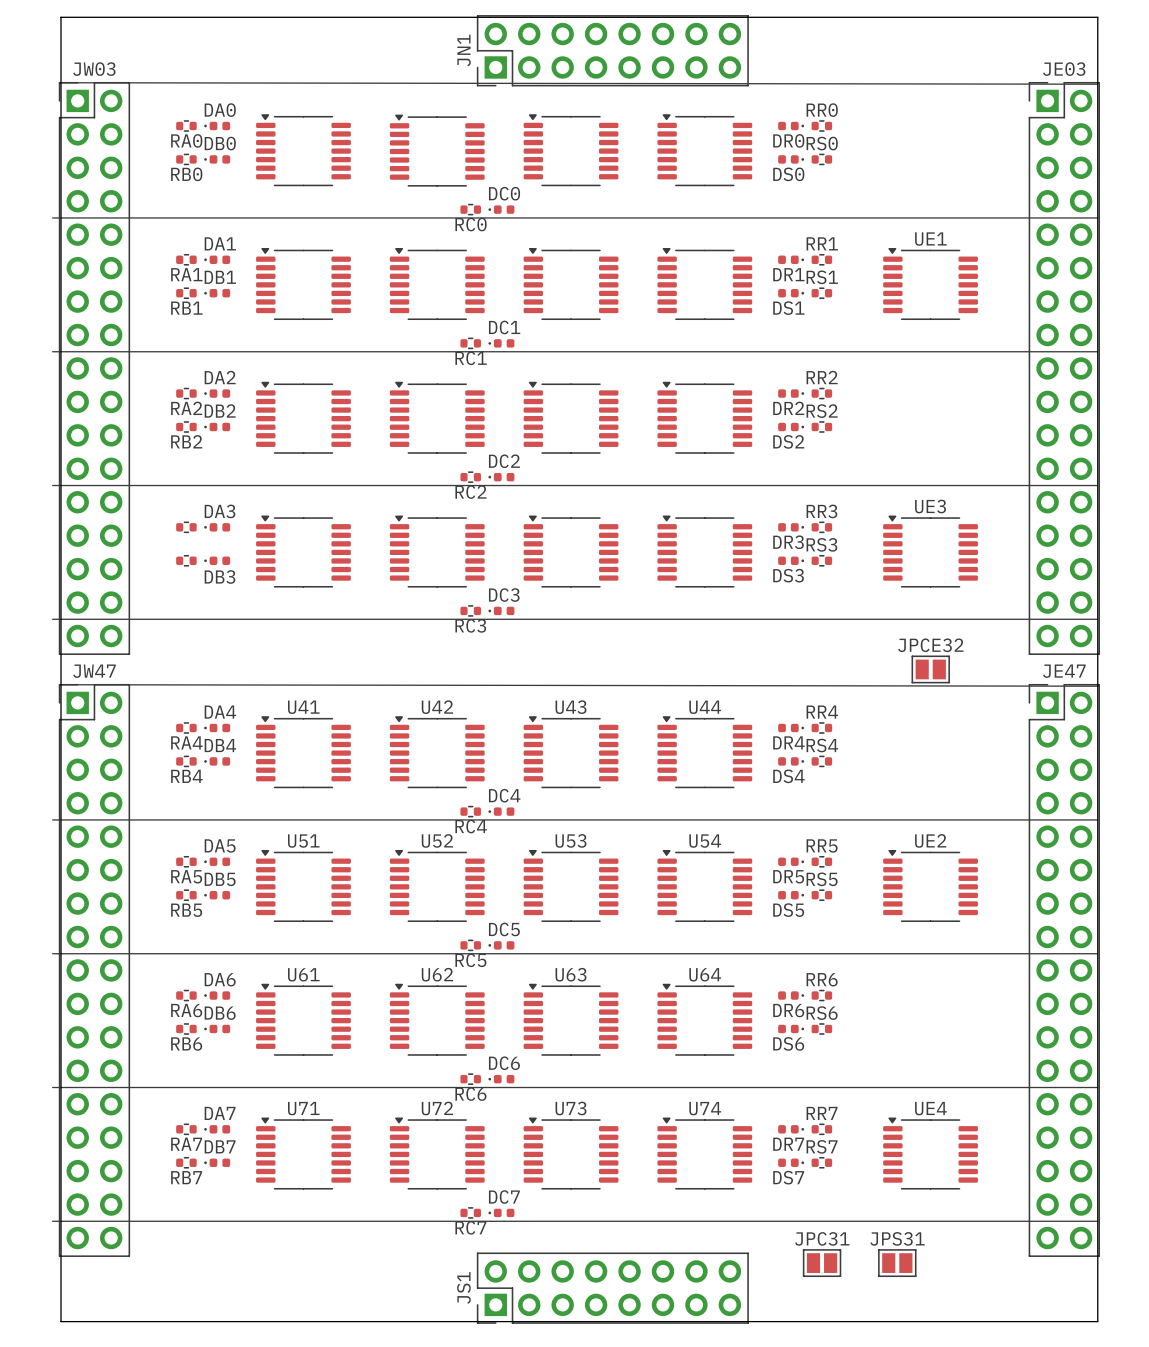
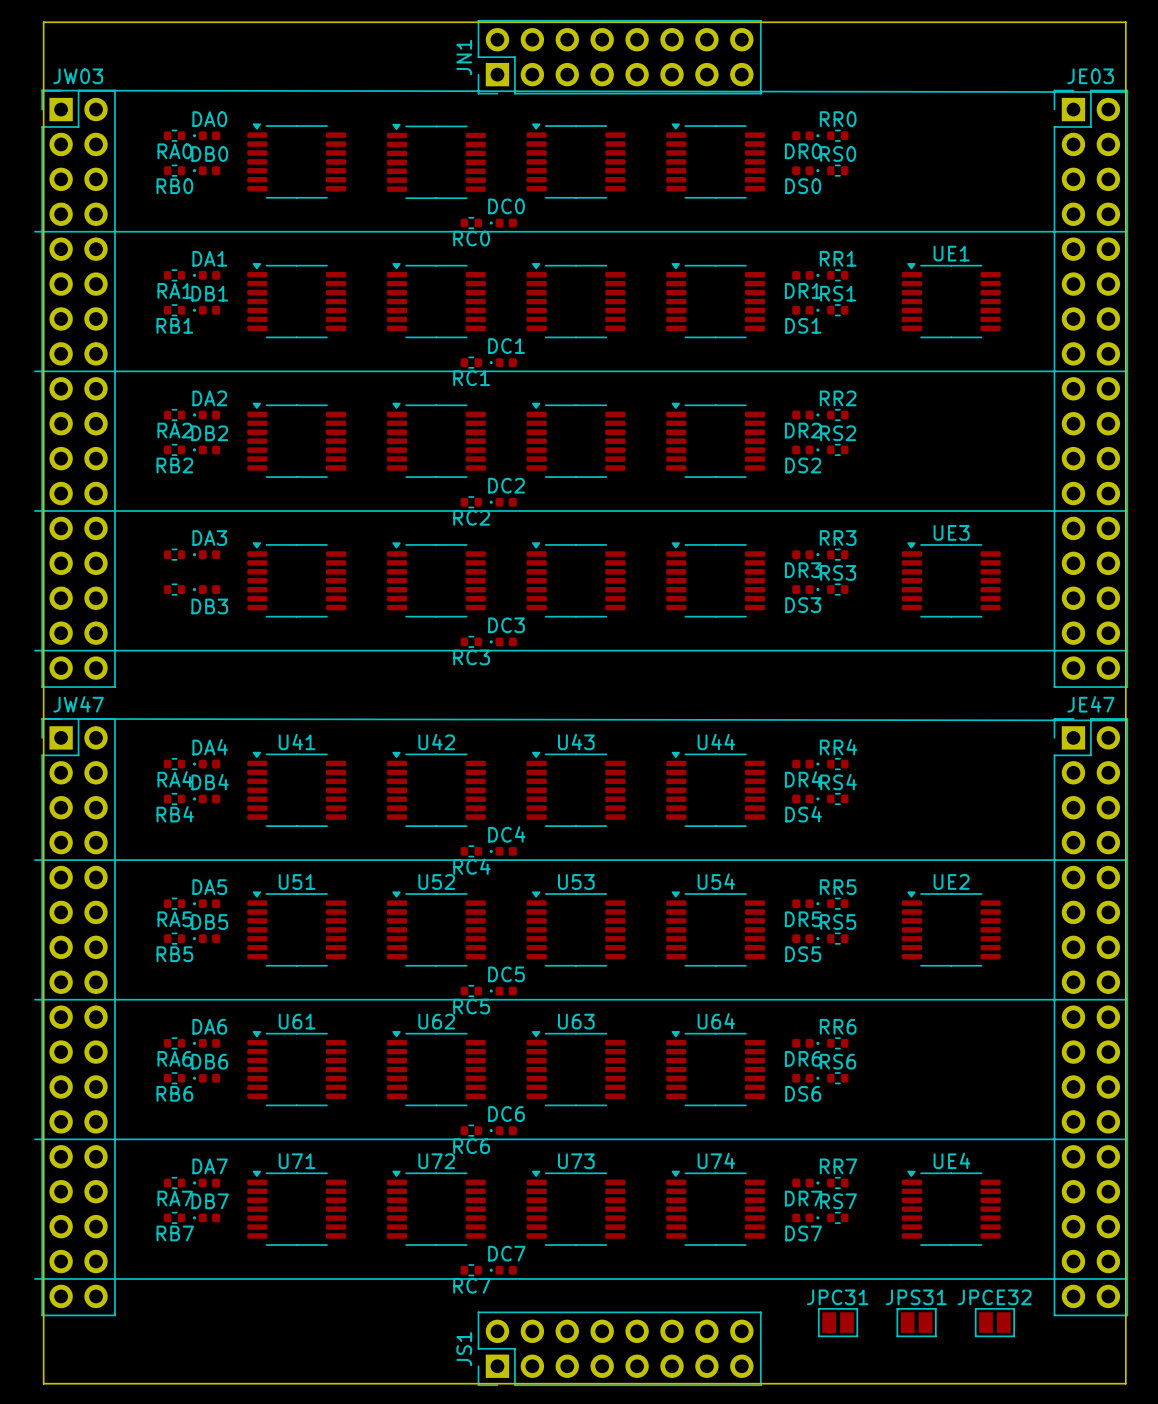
JPCE32 position: (930, 669) -> (994, 1322)

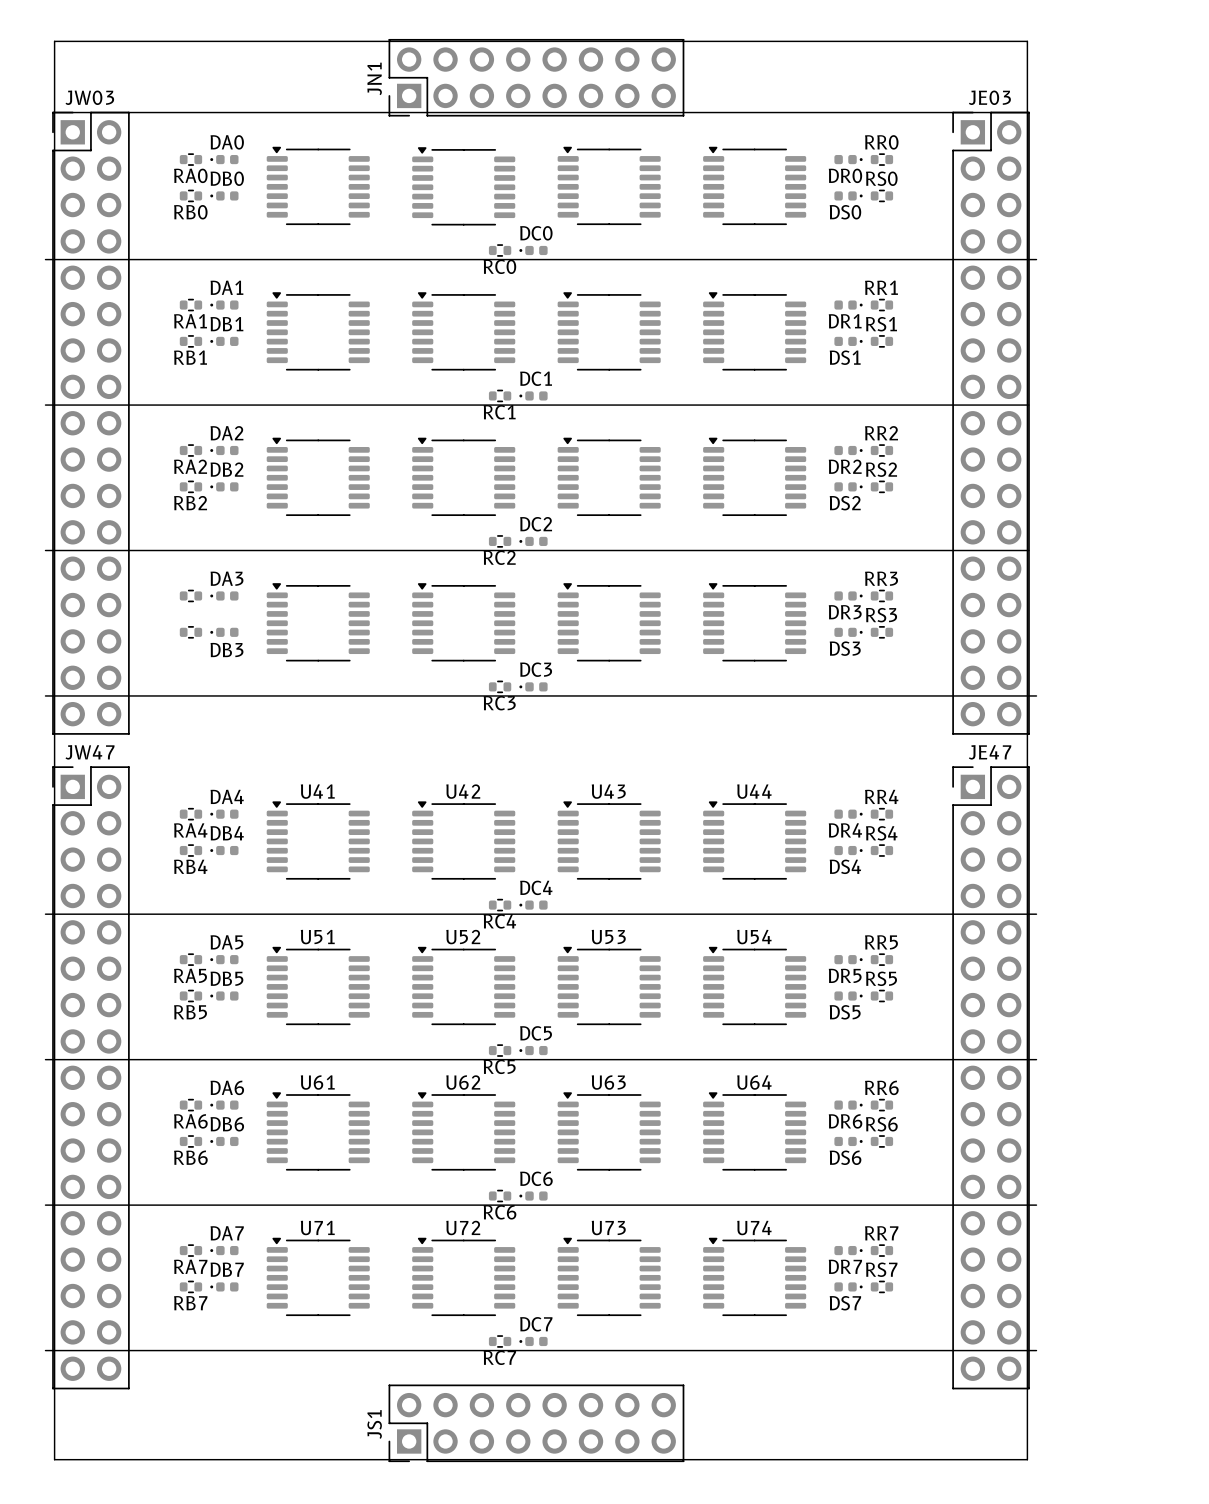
board edge: (977, 22) (1125, 22) (1125, 1383) (977, 1383) -> (1027, 41) (1027, 1459)
JN1 position: (619, 57) -> (536, 77)
line: (42, 90) (1125, 92) -> (53, 112) (1028, 112)
line: (986, 231) (1125, 231) -> none
UE1: (951, 300) -> none
line: (978, 371) (1125, 371) -> none
JE03 position: (1090, 388) -> (991, 423)
line: (978, 510) (1125, 510) -> none
UE3: (951, 579) -> none
line: (986, 650) (1125, 650) -> none
line: (42, 718) (1127, 720) -> none
line: (986, 860) (1125, 860) -> none
UE2: (951, 928) -> none
line: (986, 999) (1125, 999) -> none
JE47 position: (1090, 1017) -> (991, 1077)
line: (986, 1139) (1125, 1139) -> none
UE4: (951, 1208) -> none
line: (986, 1278) (1125, 1278) -> none
JPC31: (838, 1322) -> none
JPS31: (916, 1322) -> none
JPCE32: (994, 1322) -> none
JS1 position: (619, 1348) -> (536, 1423)

